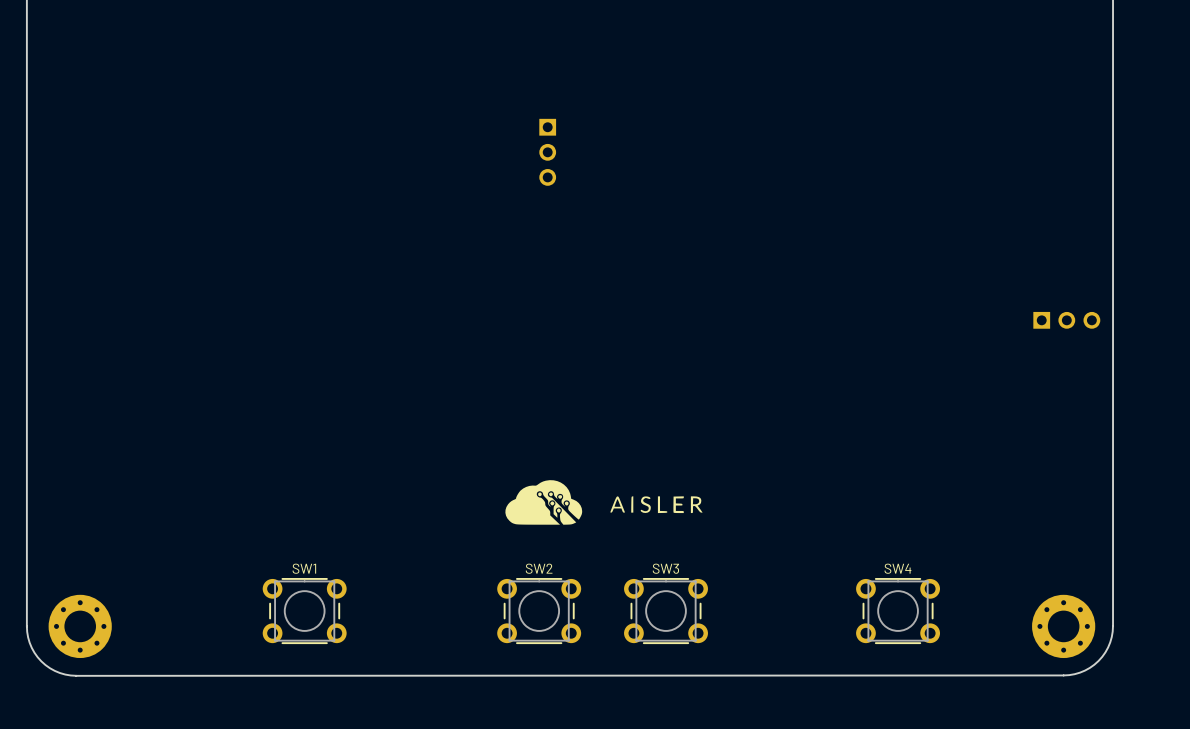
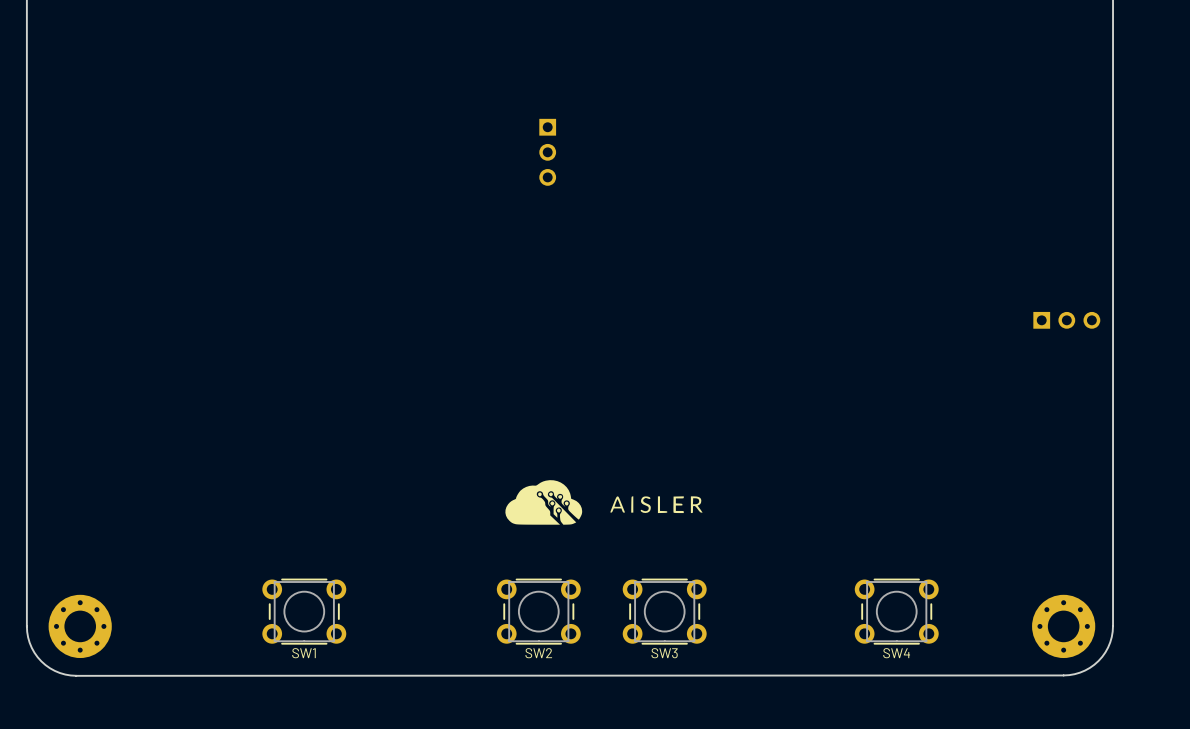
SW1 rotation: 0° (304, 611) -> 180° (304, 611)
SW2 rotation: 0° (539, 611) -> 180° (538, 611)
SW3 rotation: 0° (666, 611) -> 180° (664, 611)
SW4 rotation: 0° (898, 611) -> 180° (896, 611)

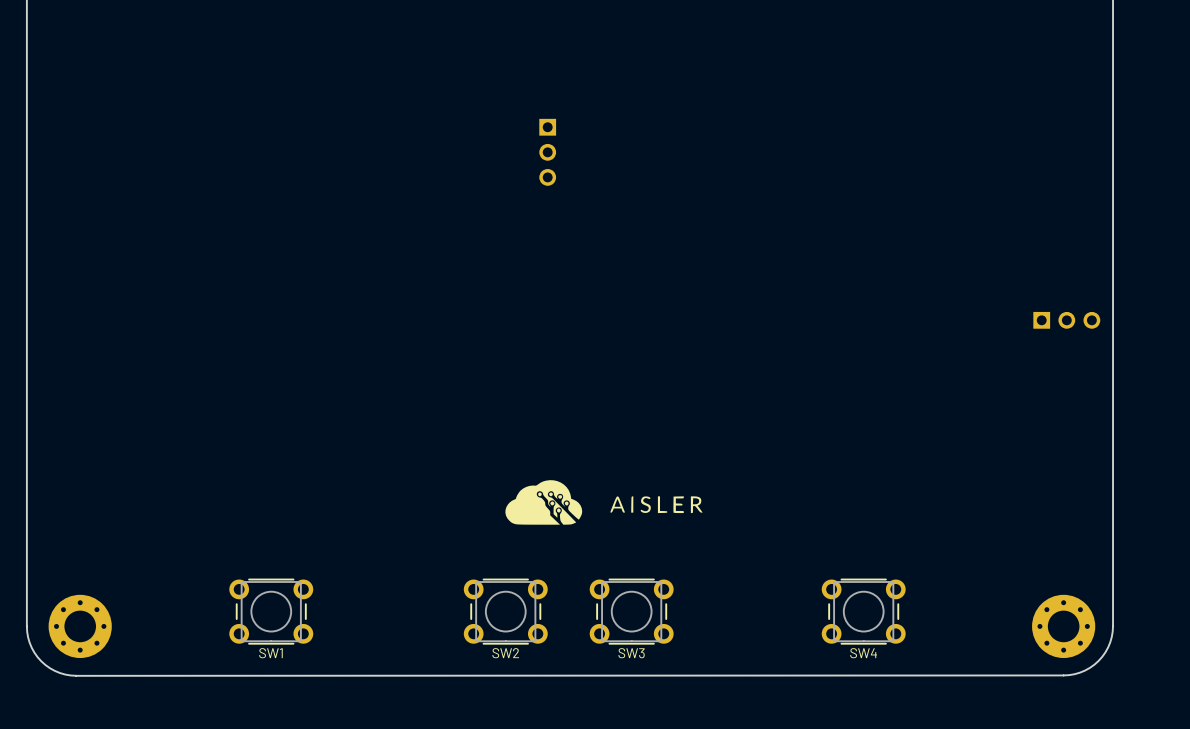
SW1 position: (304, 611) -> (271, 611)
SW2 position: (538, 611) -> (505, 611)
SW3 position: (664, 611) -> (631, 611)
SW4 position: (896, 611) -> (863, 611)

